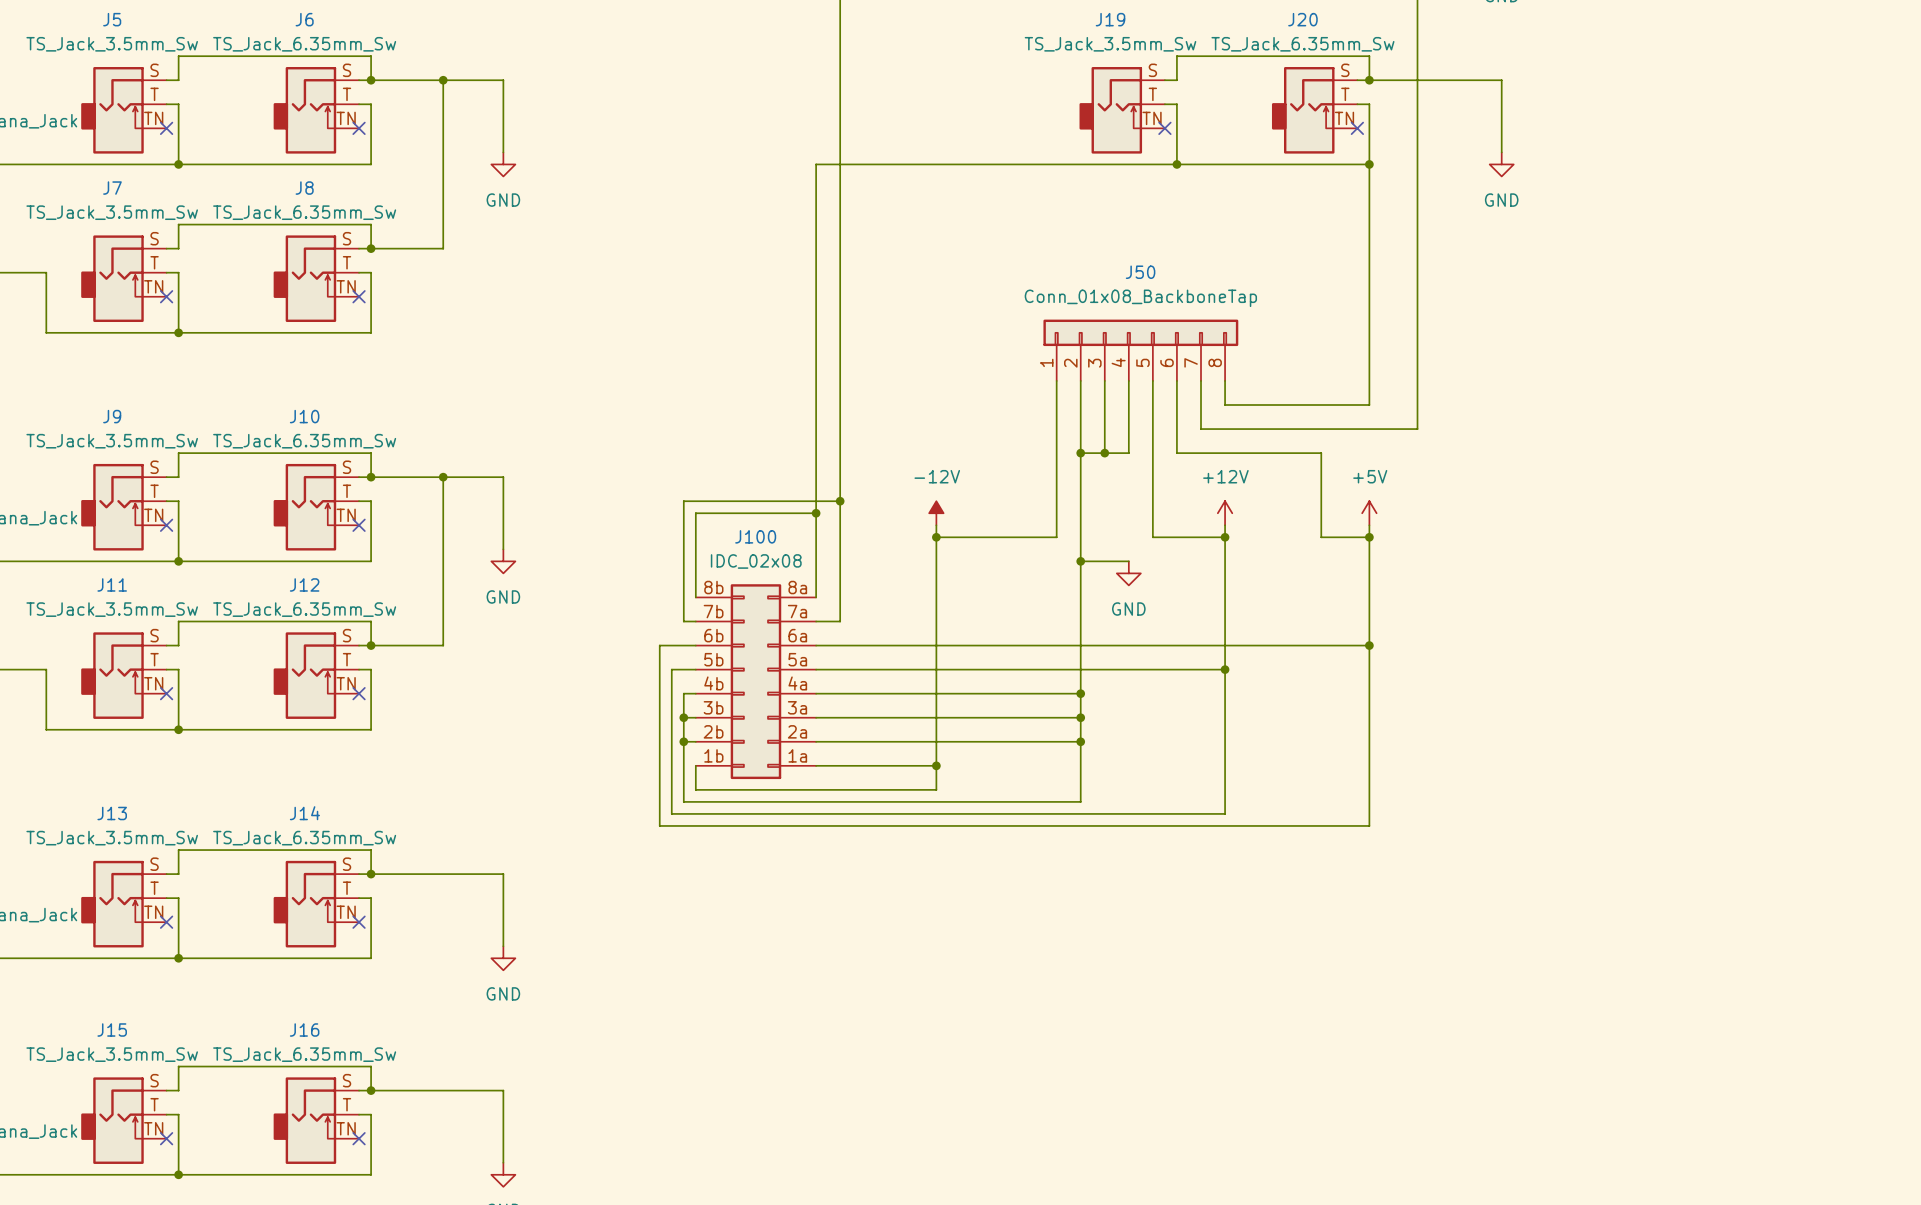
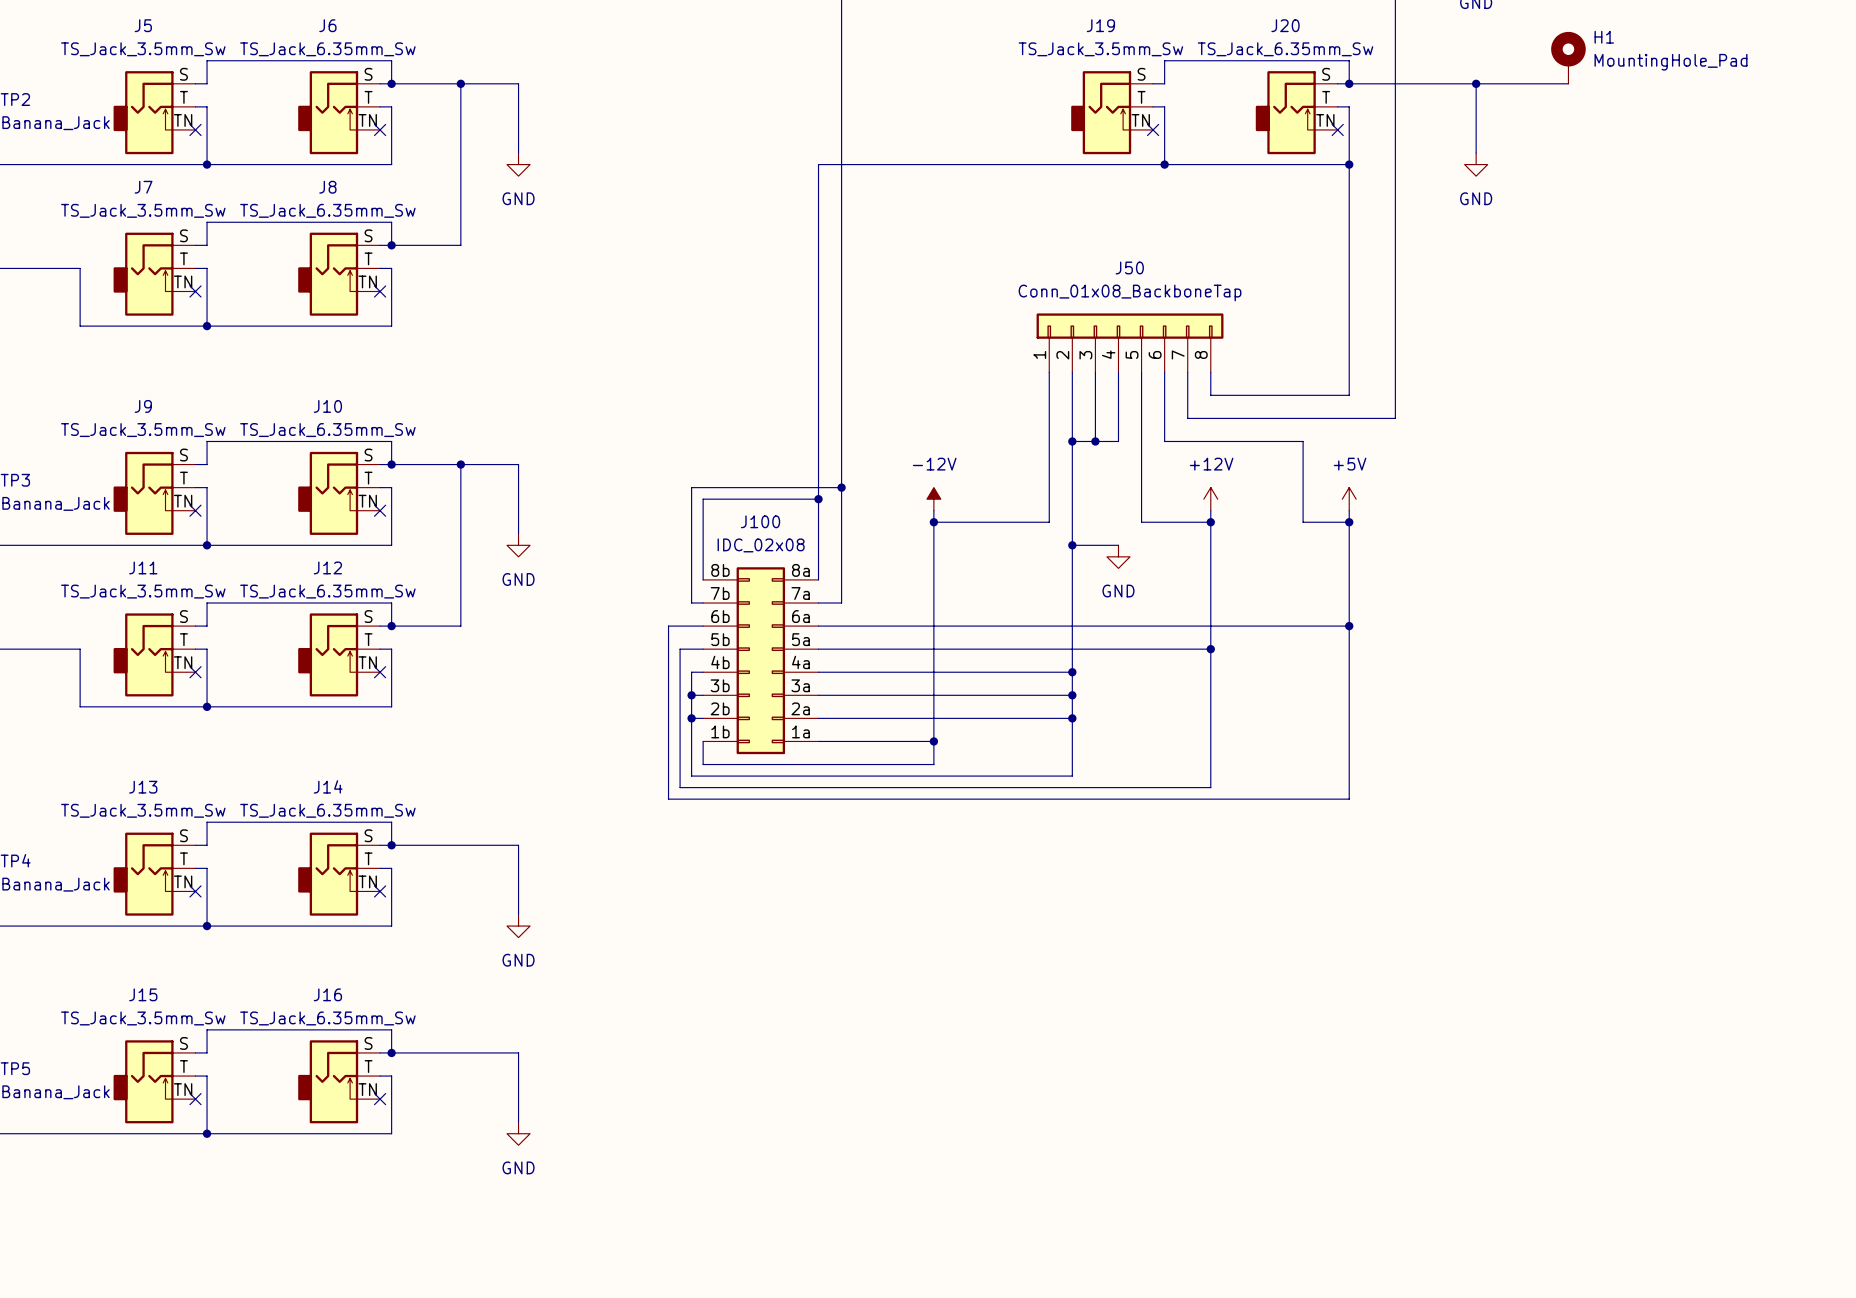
H1: none -> MountingHole_Pad (1568, 57)
wire: none -> (1476, 83) (1568, 83)
junction: none -> (1476, 83)

